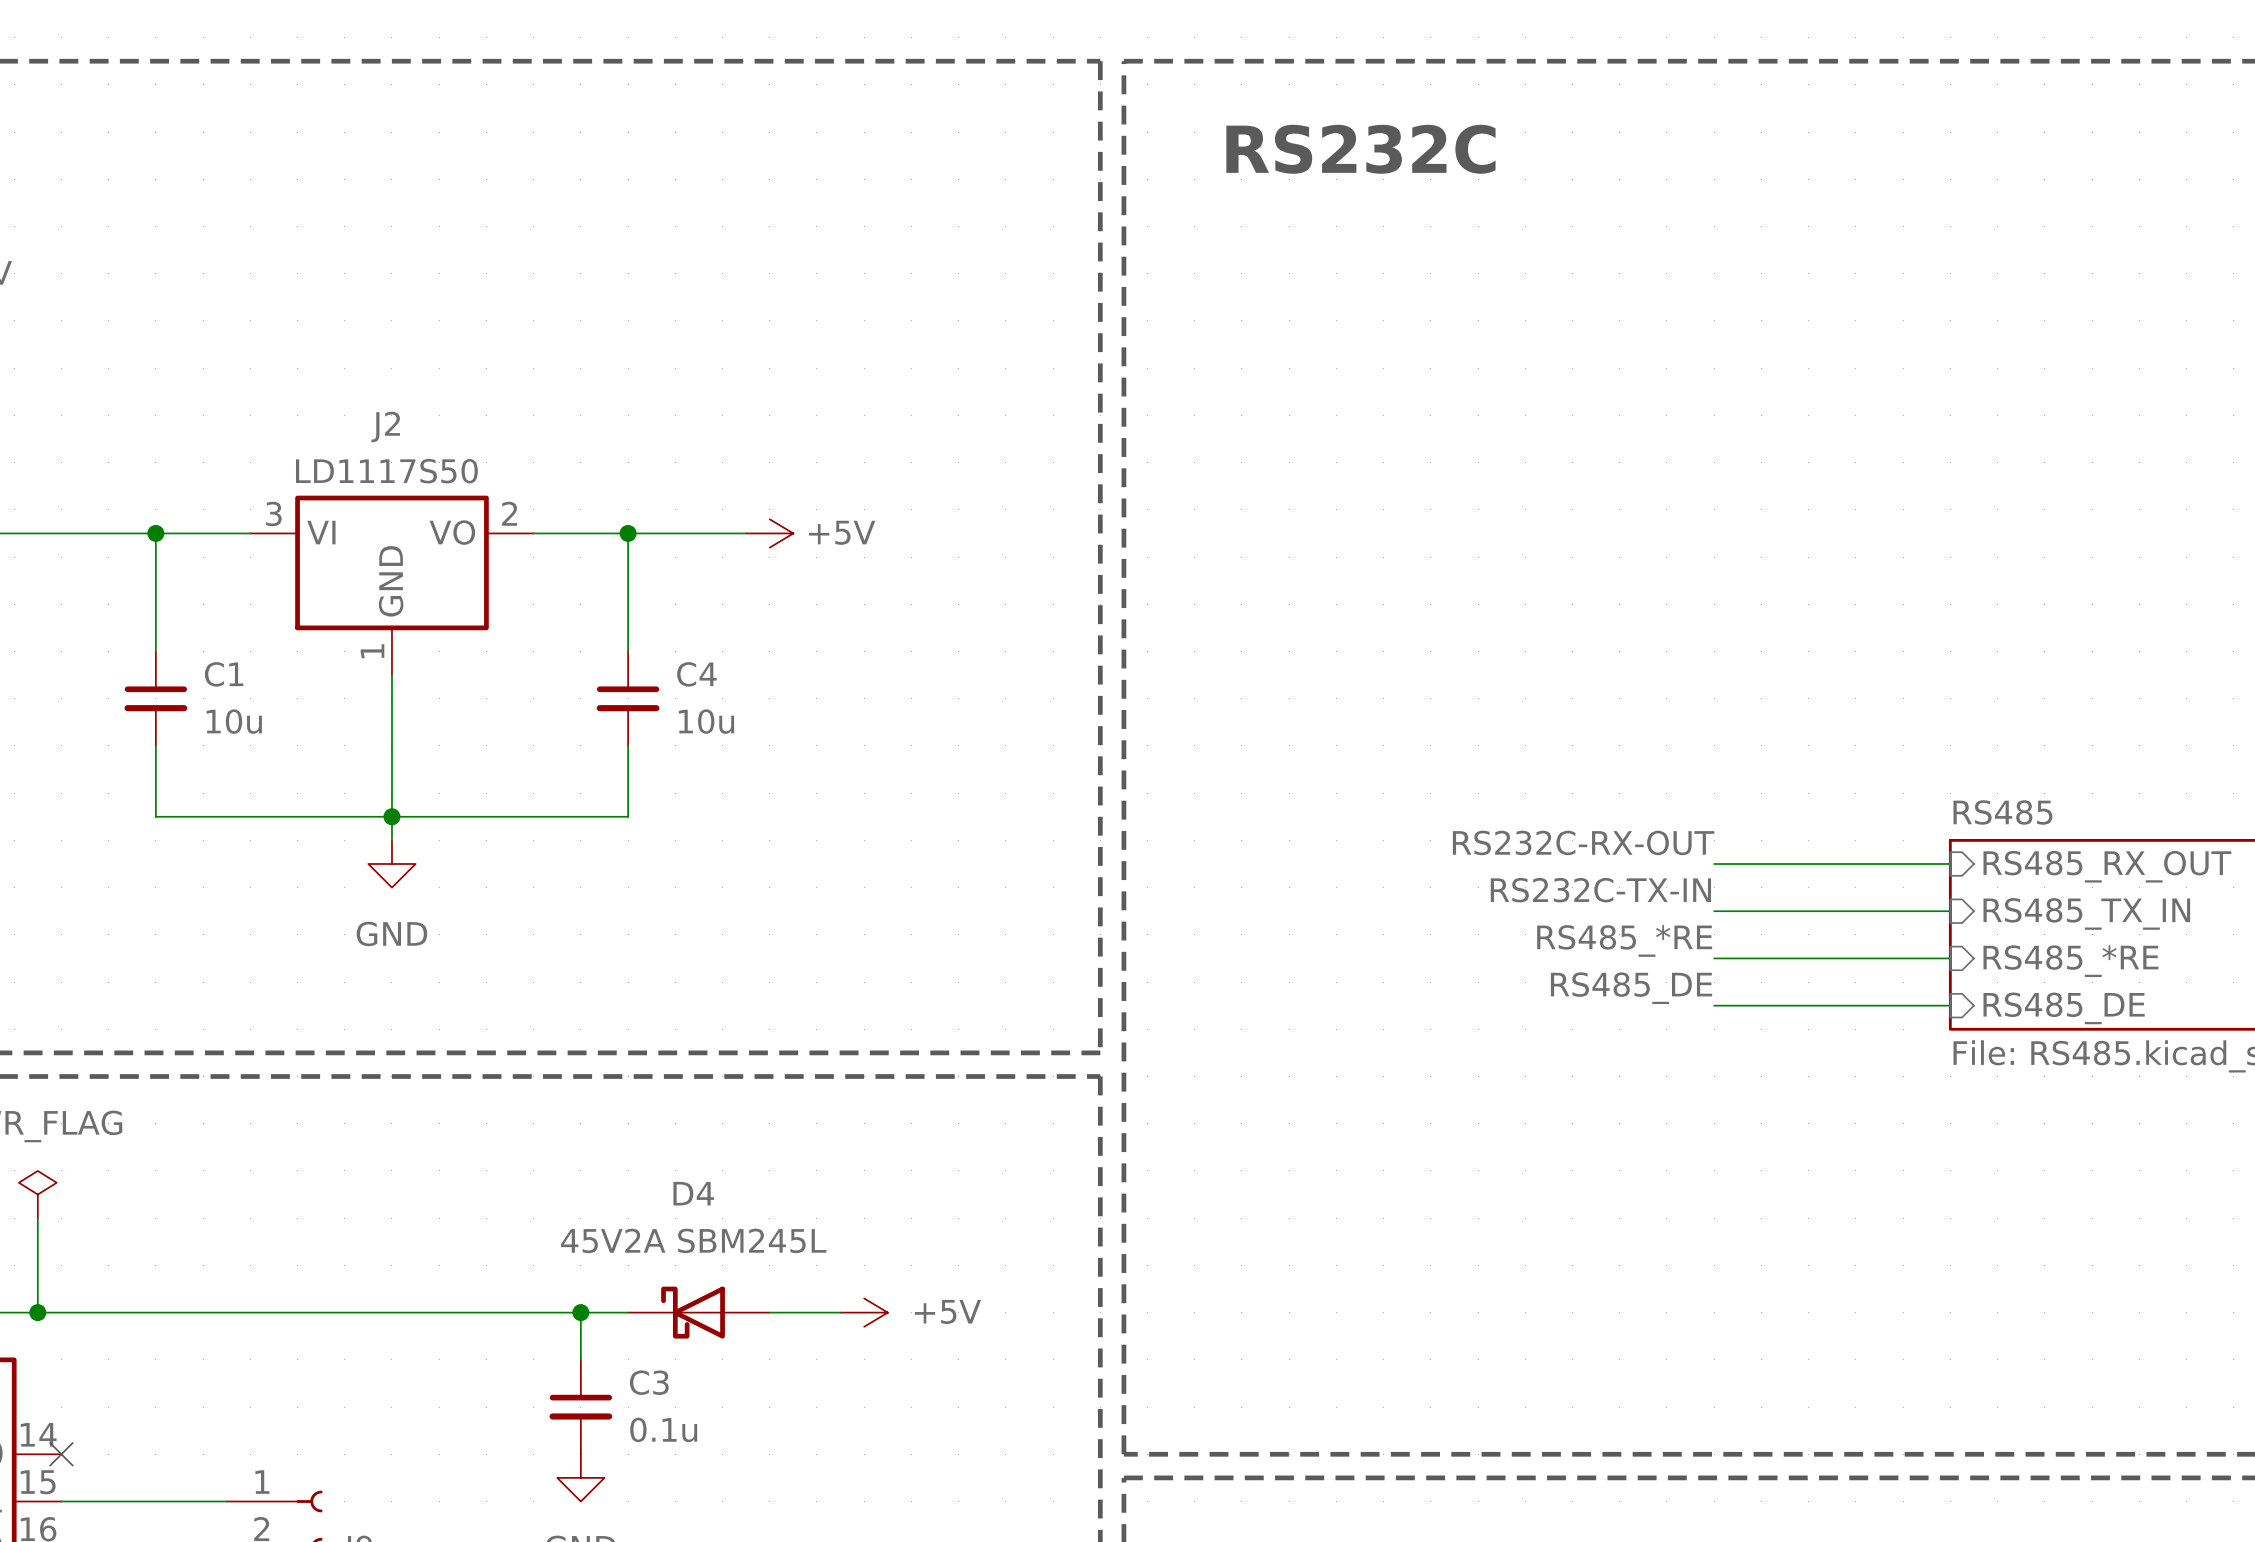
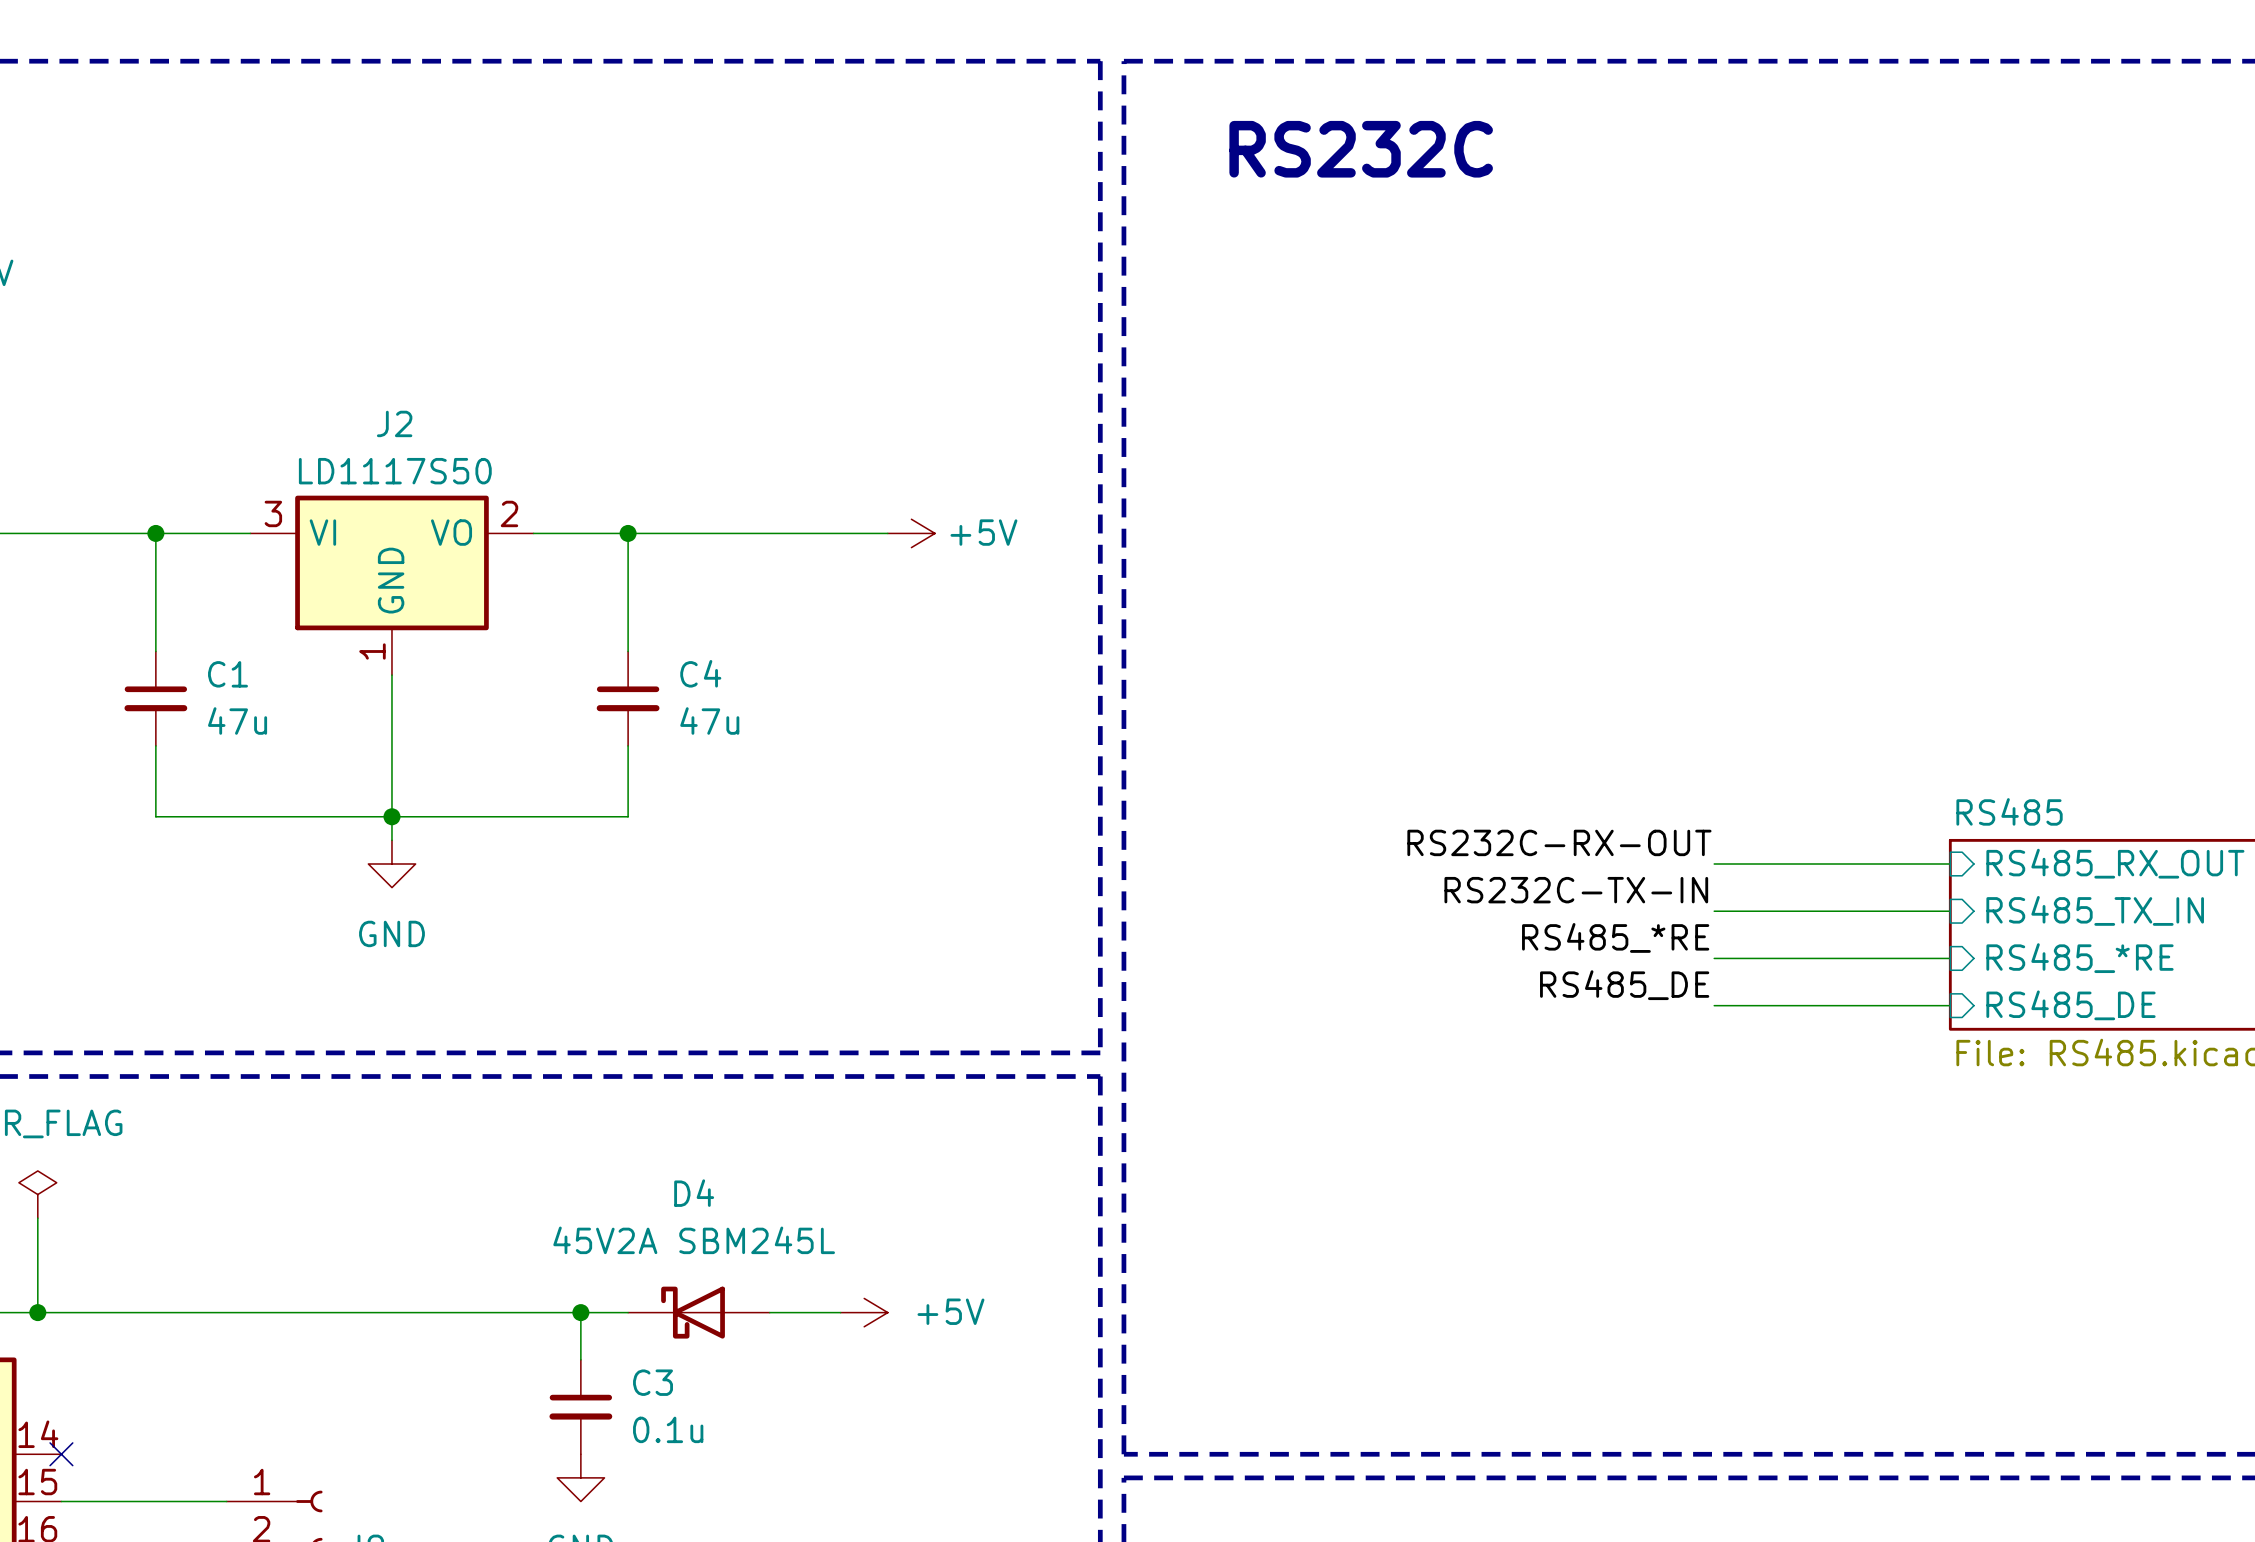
wire: none -> (746, 533) (887, 533)
power symbol position: +5V (769, 533) -> +5V (911, 533)
C1 value: 10u (234, 721) -> 47u (237, 721)
C4 value: 10u (706, 721) -> 47u (709, 721)

